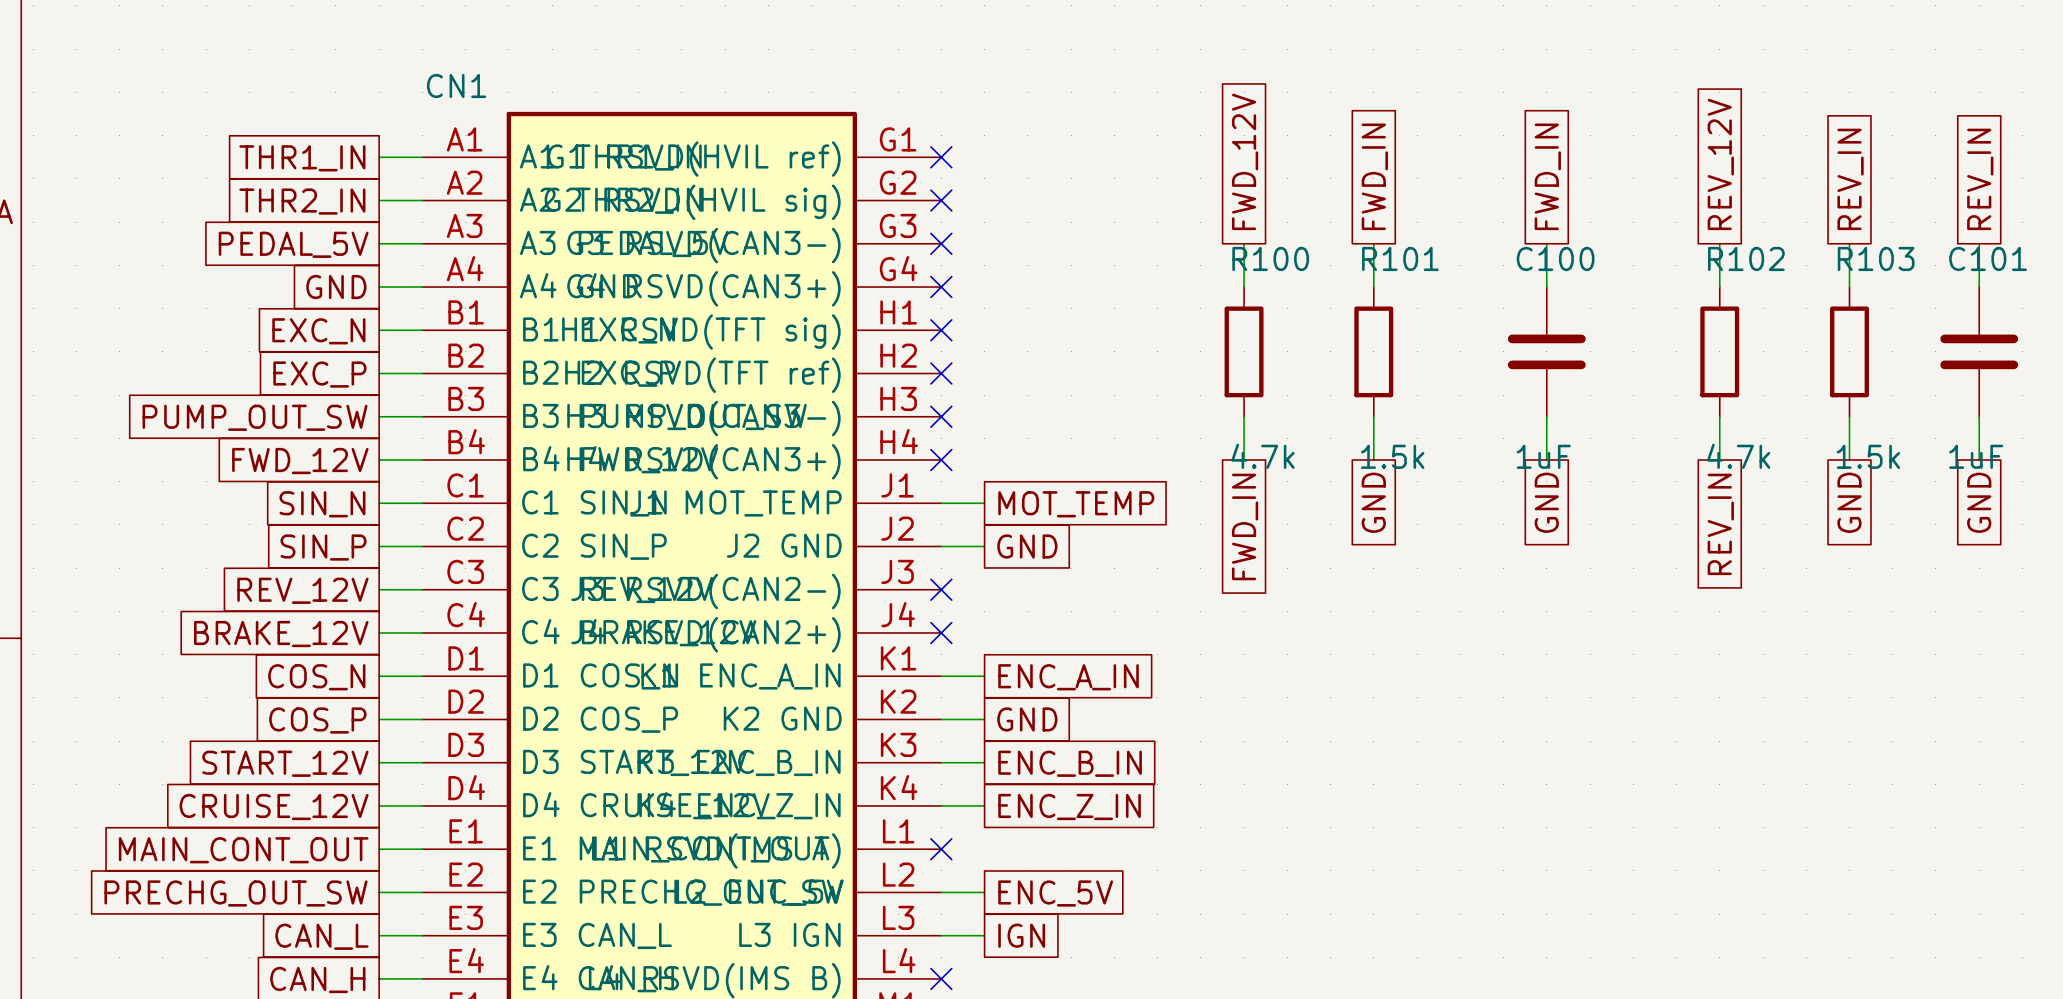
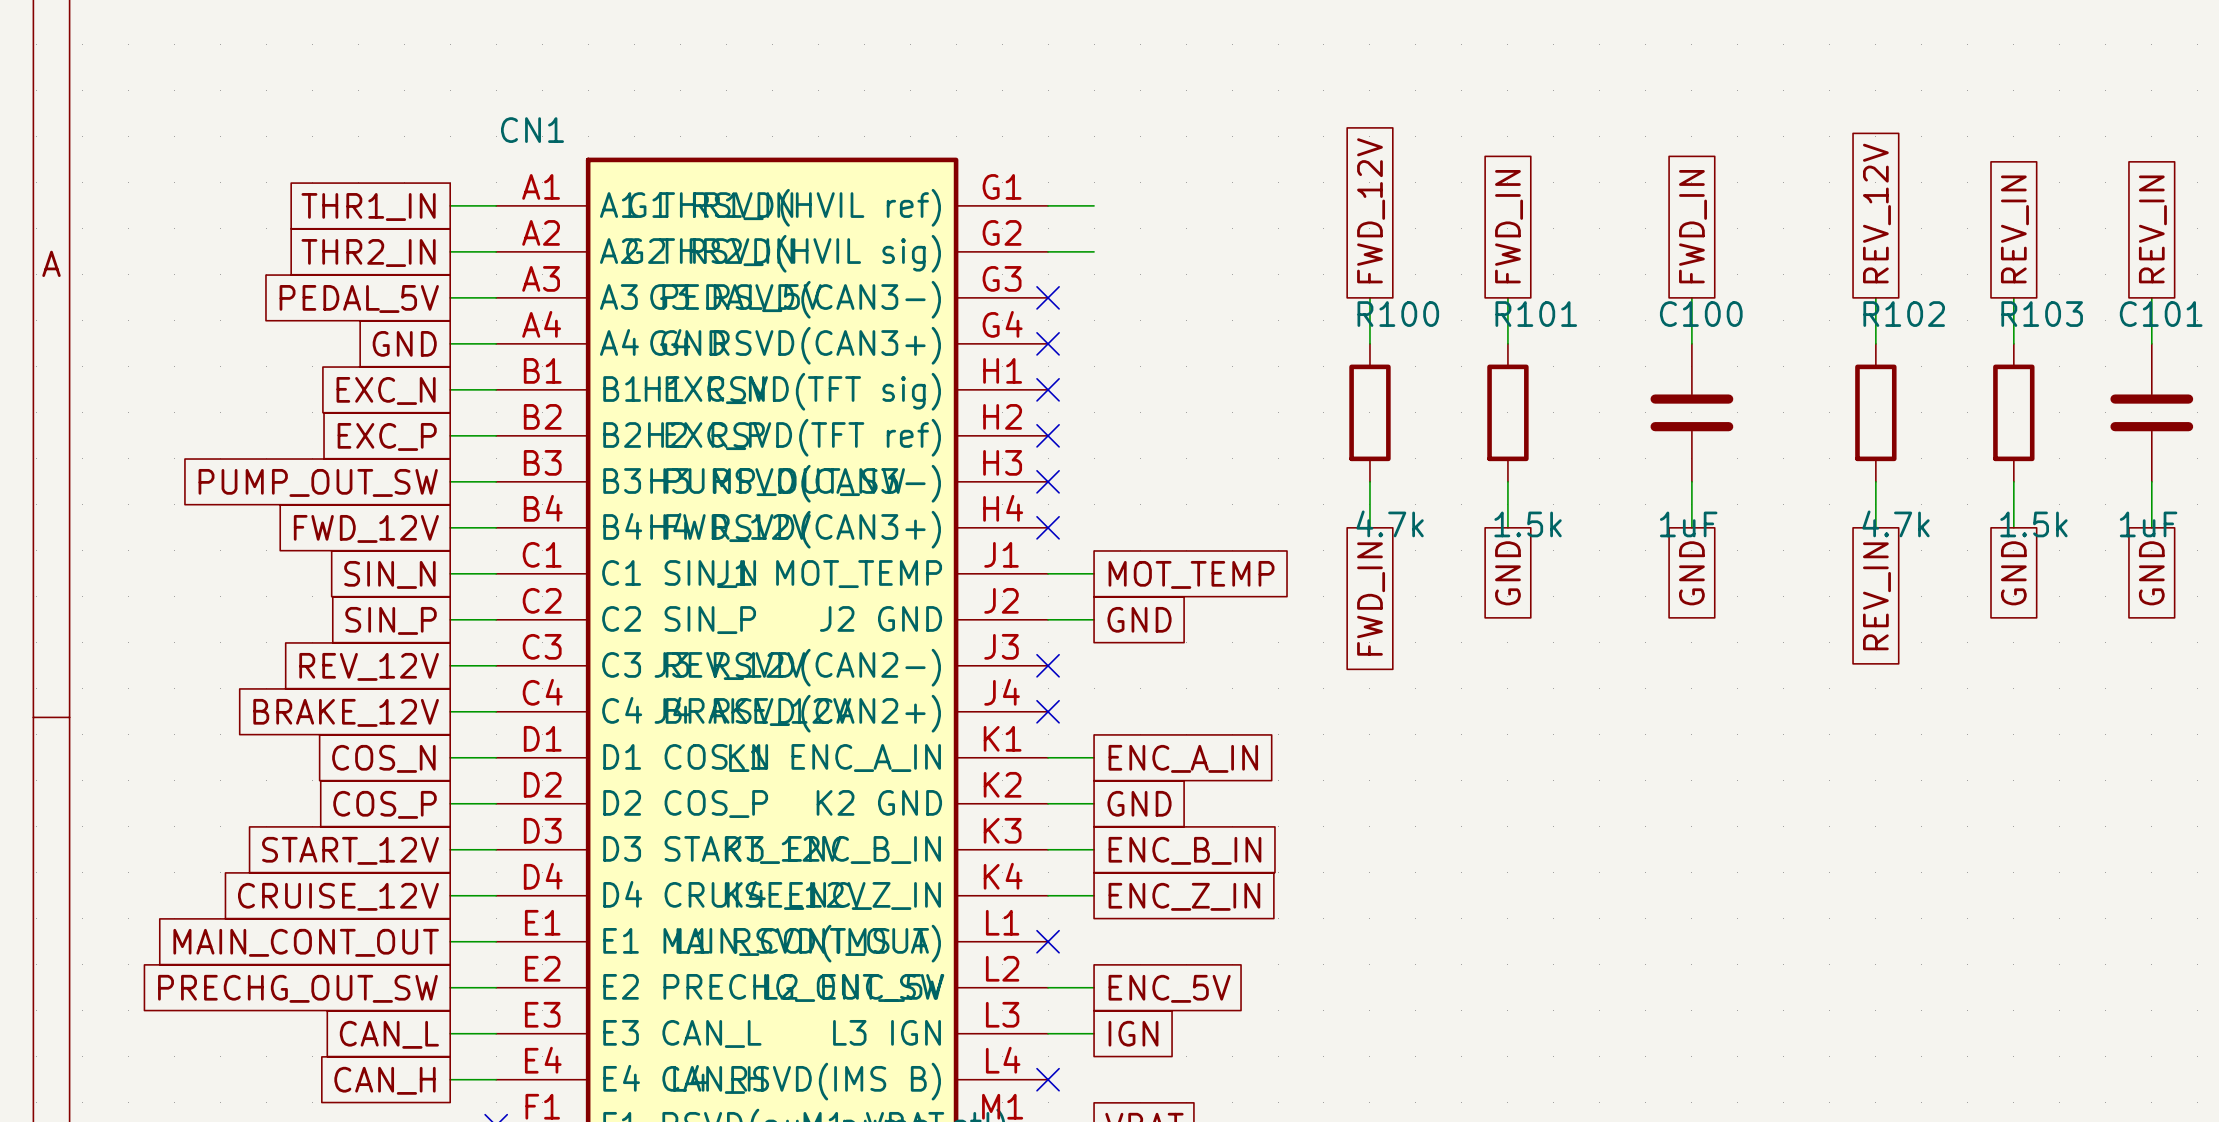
wire: none -> (1048, 205) (1094, 205)
no-connect mark: (941, 157) -> none
wire: none -> (1048, 251) (1094, 251)
no-connect mark: (941, 200) -> none

